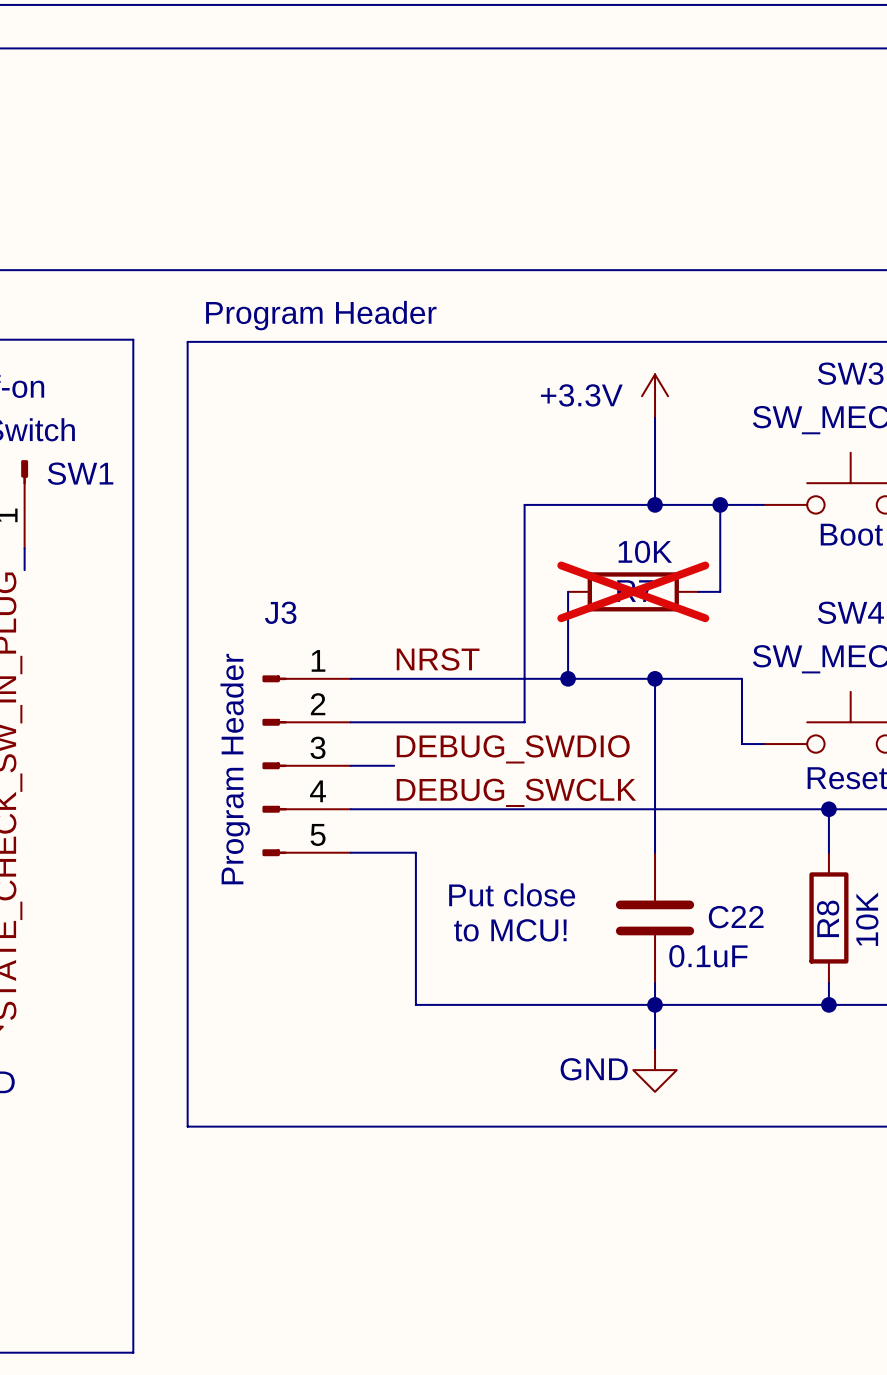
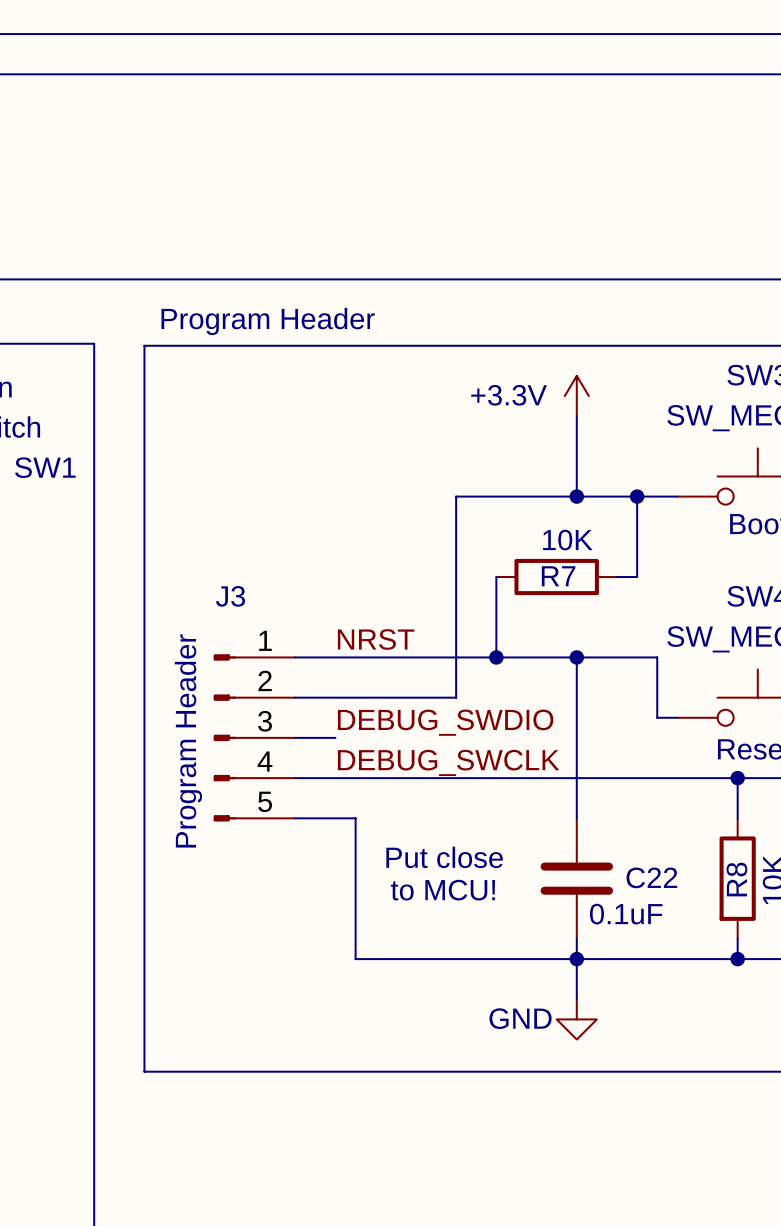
R7 do-not-place cross: (633, 591) -> none

